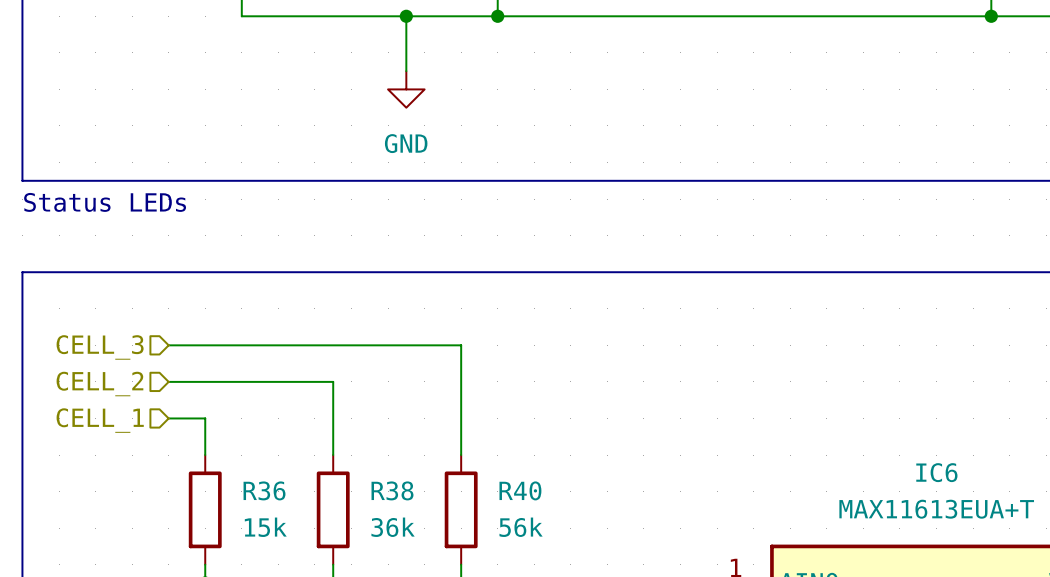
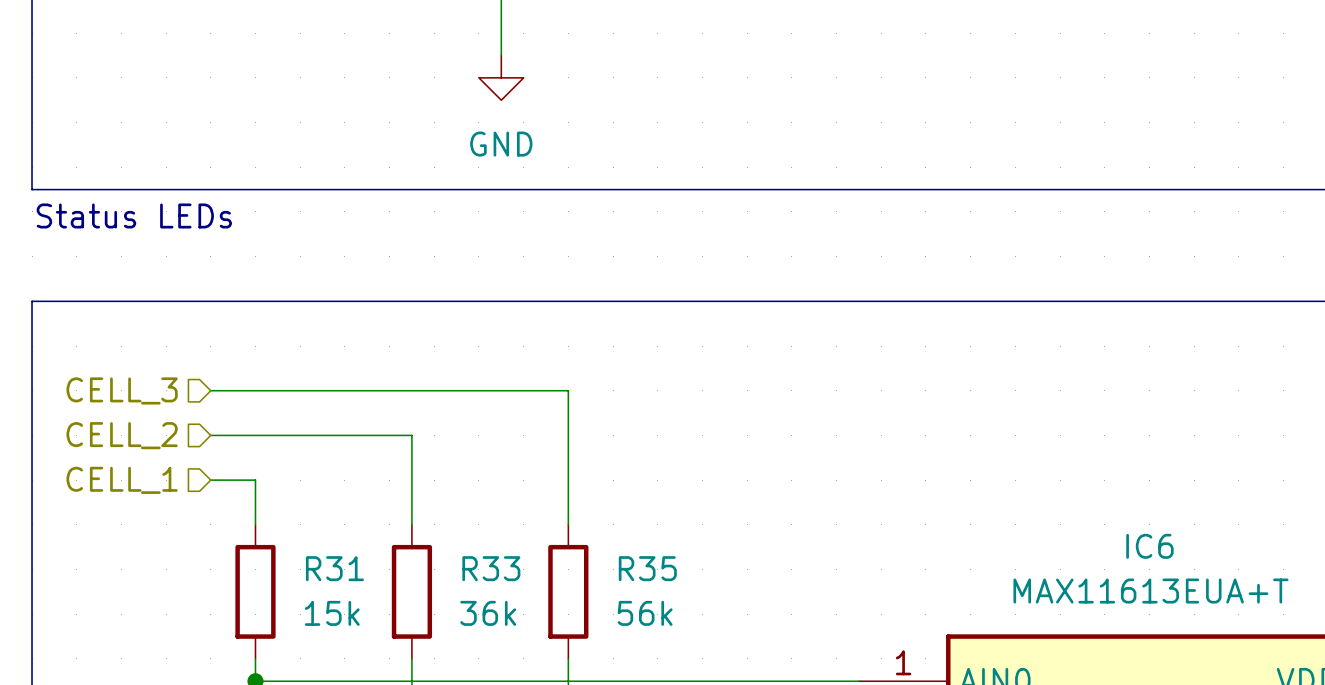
R36 name: R36 (264, 490) -> R31 (334, 568)
R38 name: R38 (392, 490) -> R33 (491, 568)
R40 name: R40 (520, 490) -> R35 (647, 568)

